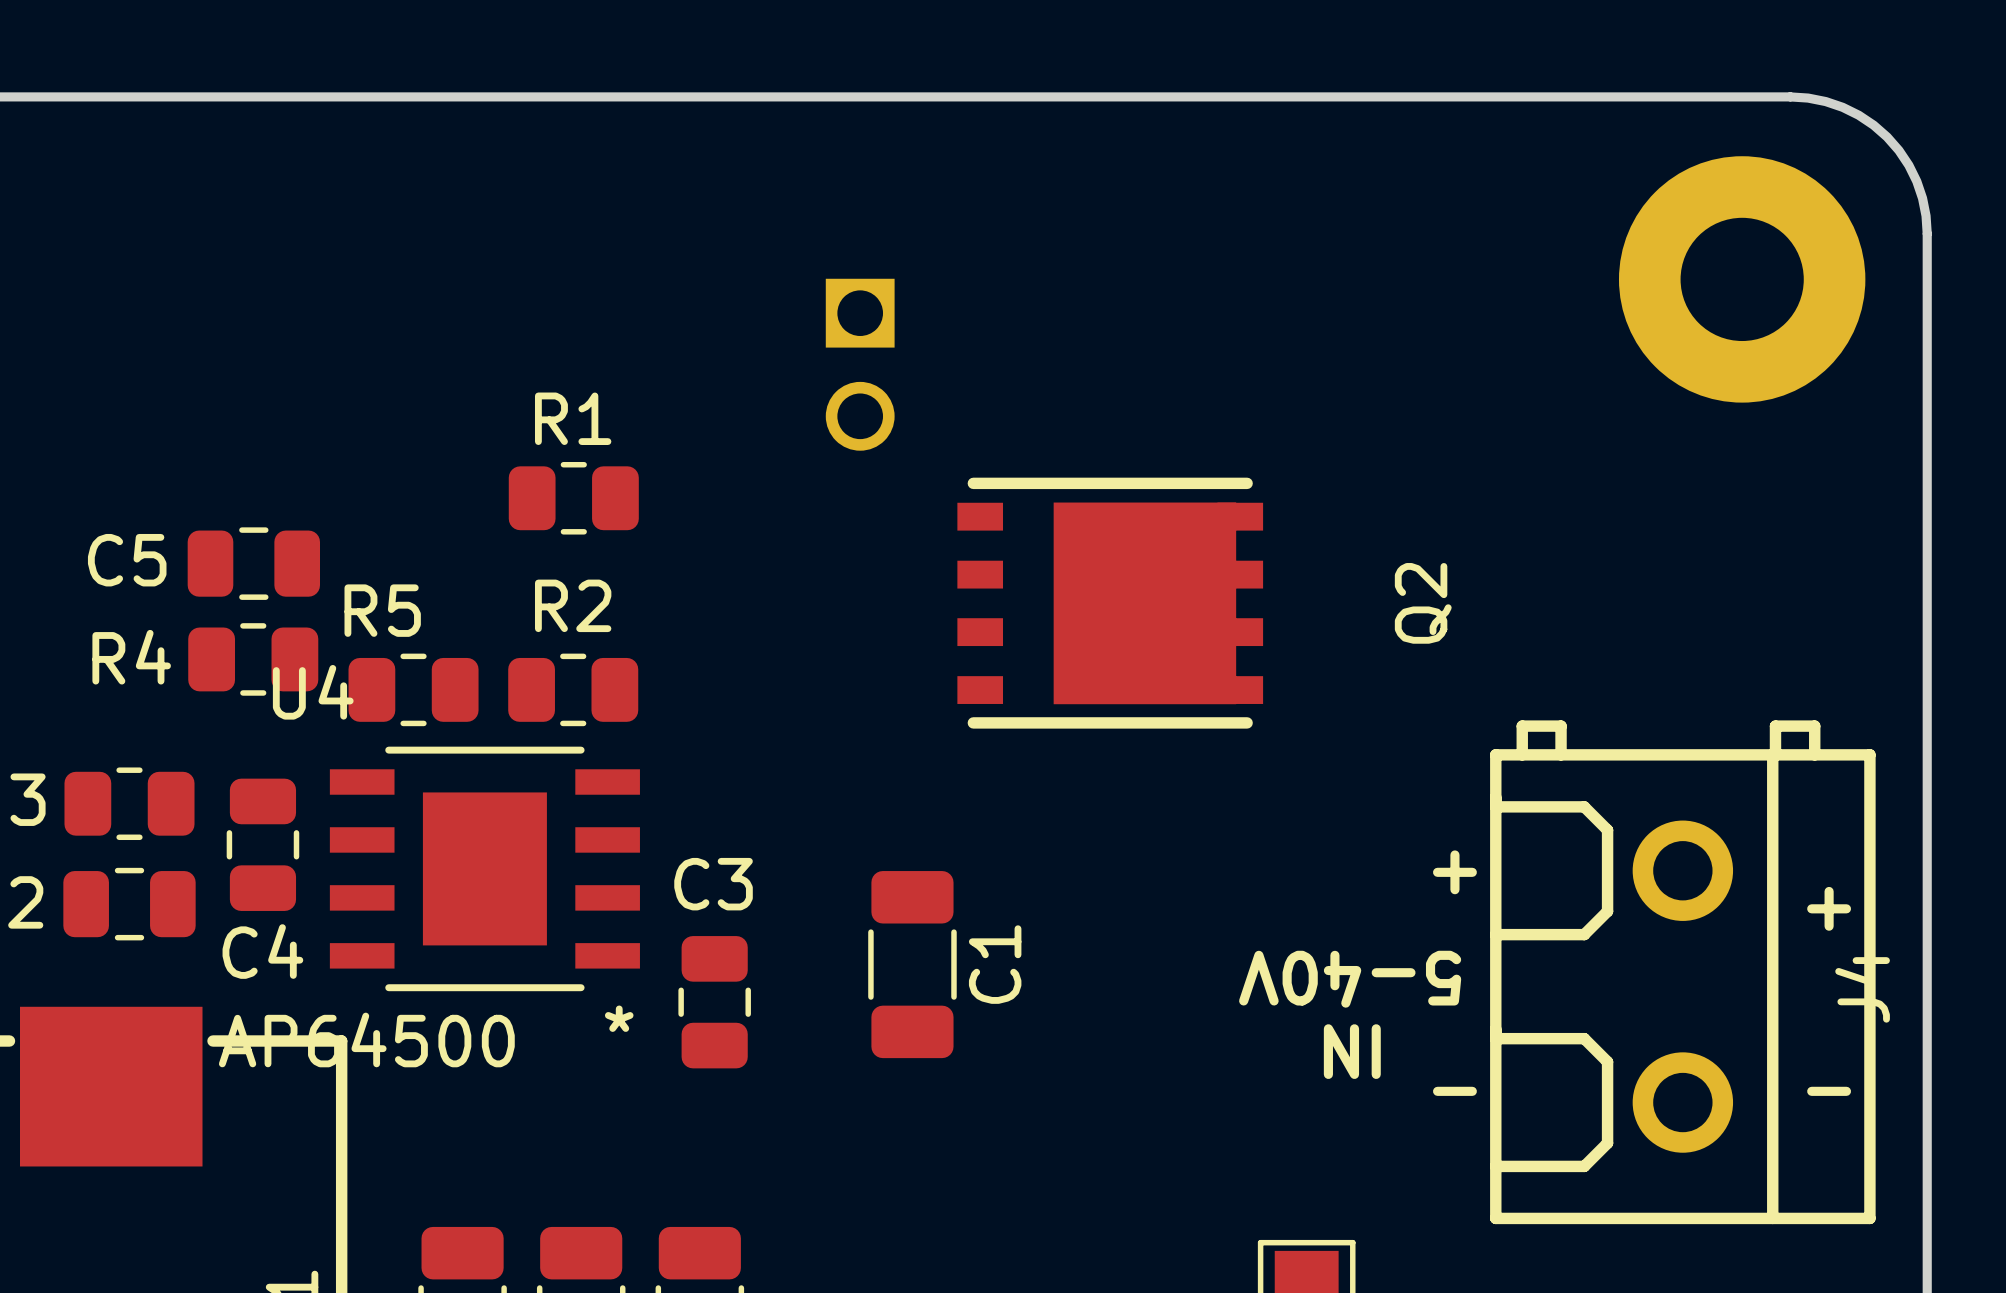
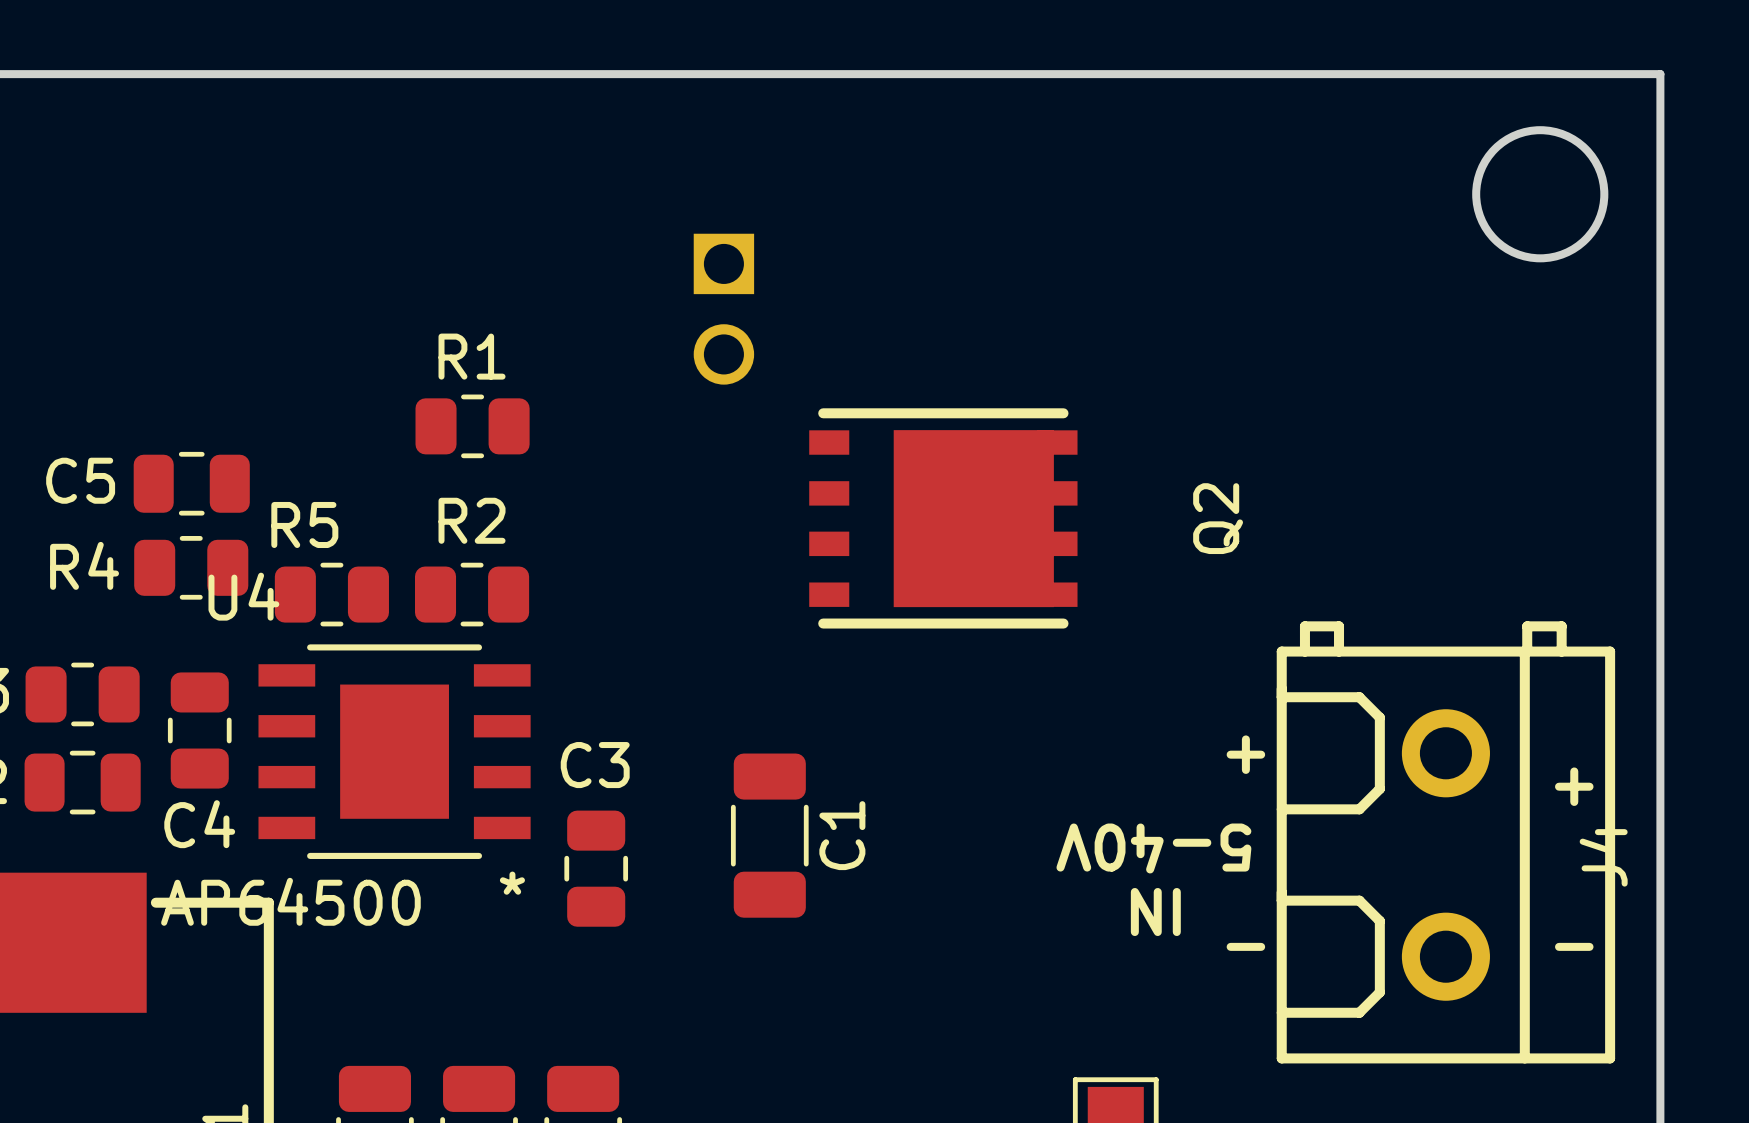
board edge: (1790, 96) (1825, 101) (1842, 107) (1873, 125) (1887, 136) (1898, 150) (1916, 181) (1922, 198) (1927, 233) -> (1540, 74) (1660, 74) (1660, 194)
round board edge: none -> [1472, 126, 1609, 263]
part: (1742, 279) -> none

